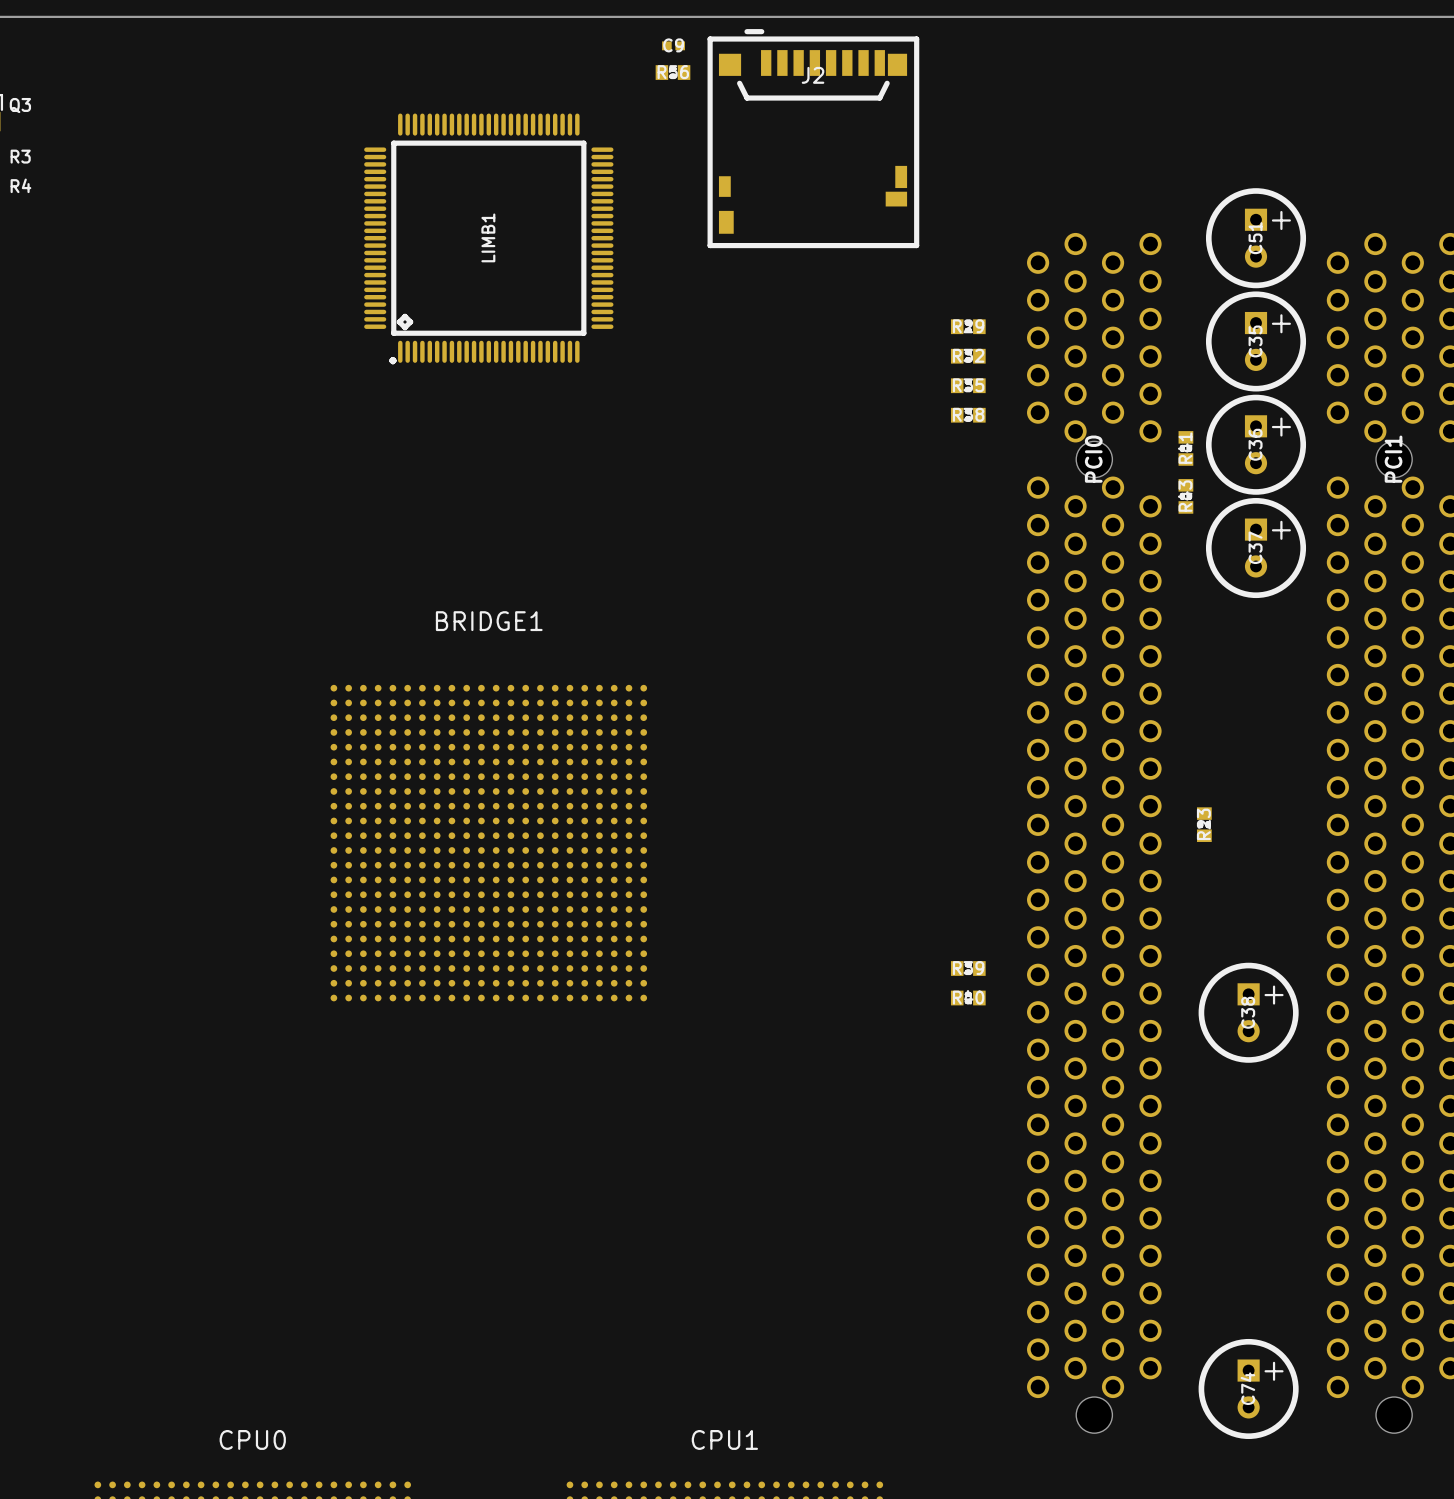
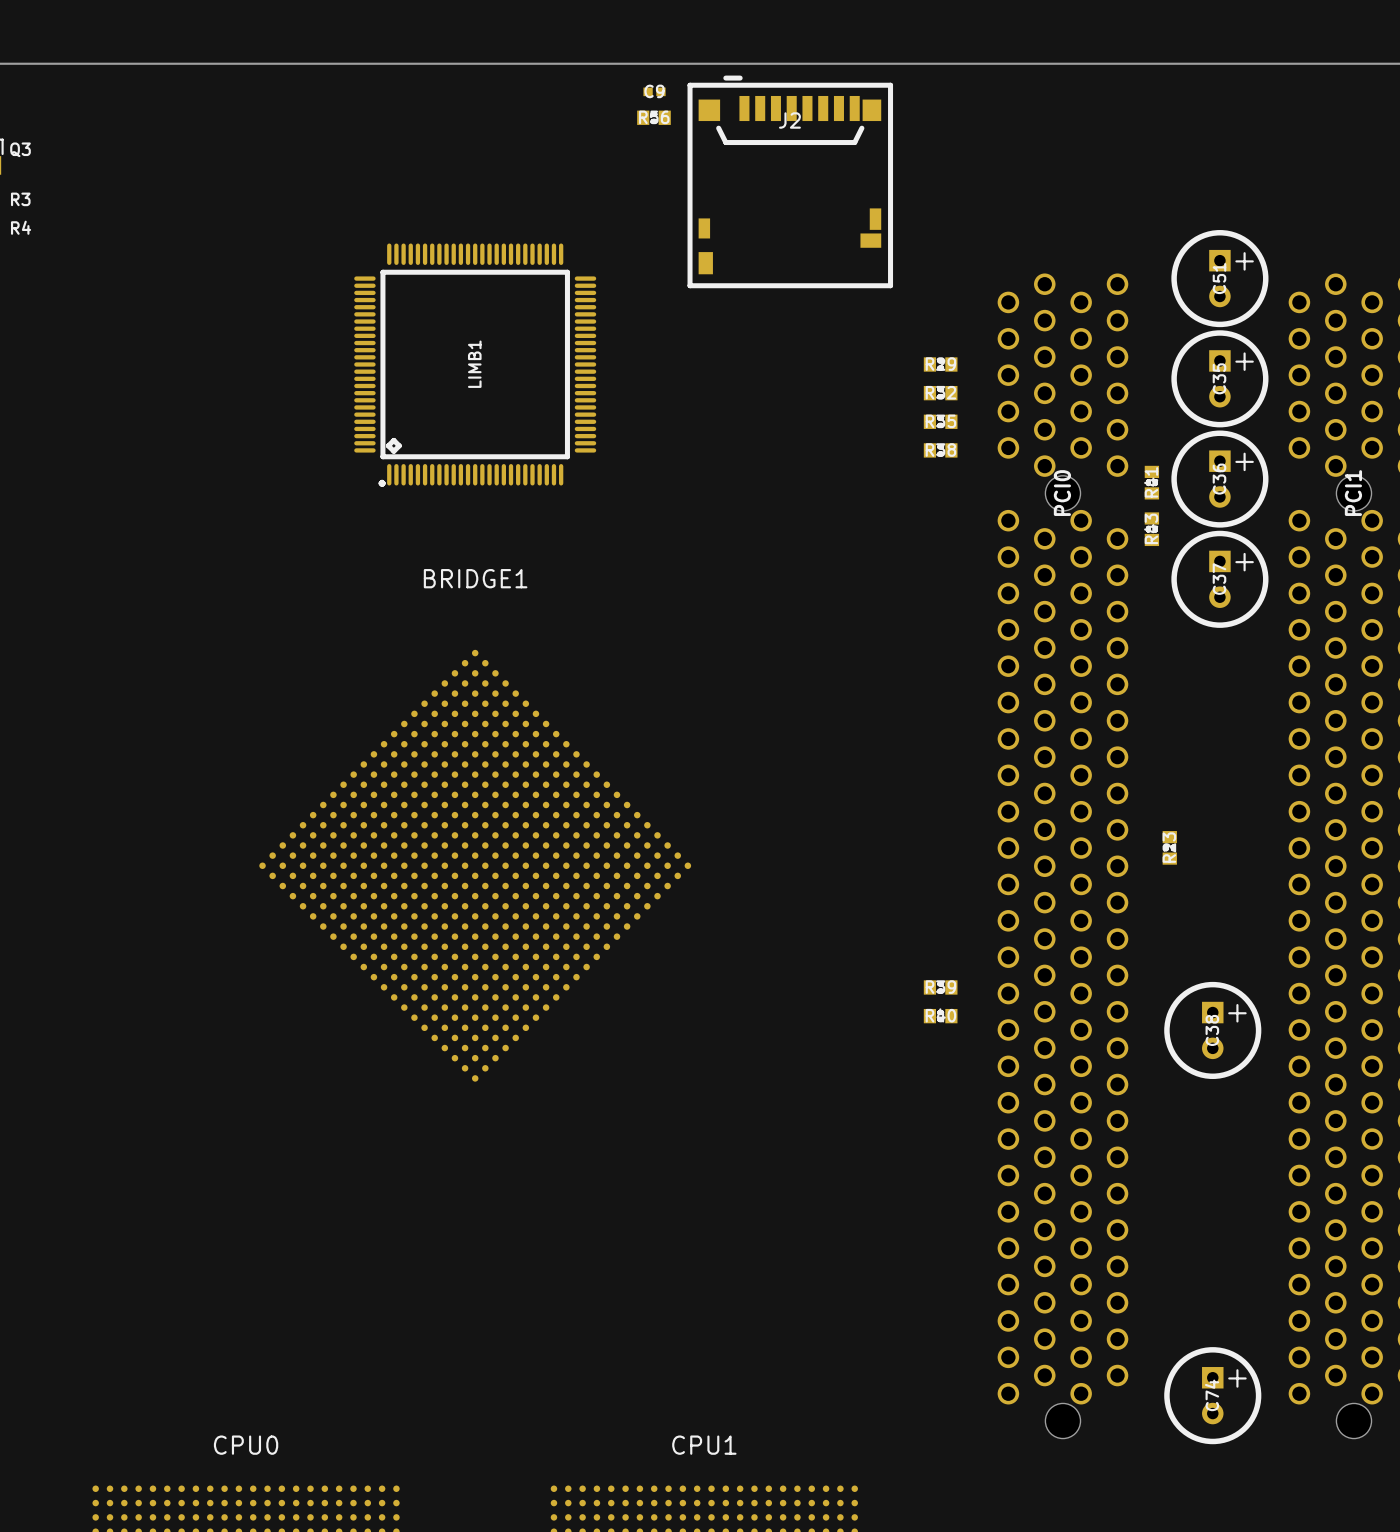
LIMB1 position: (488, 238) -> (475, 365)
BRIDGE1 name position: BRIDGE1 (489, 621) -> BRIDGE1 (475, 578)
BRIDGE1 rotation: 0° (488, 843) -> 45° clockwise (475, 865)

